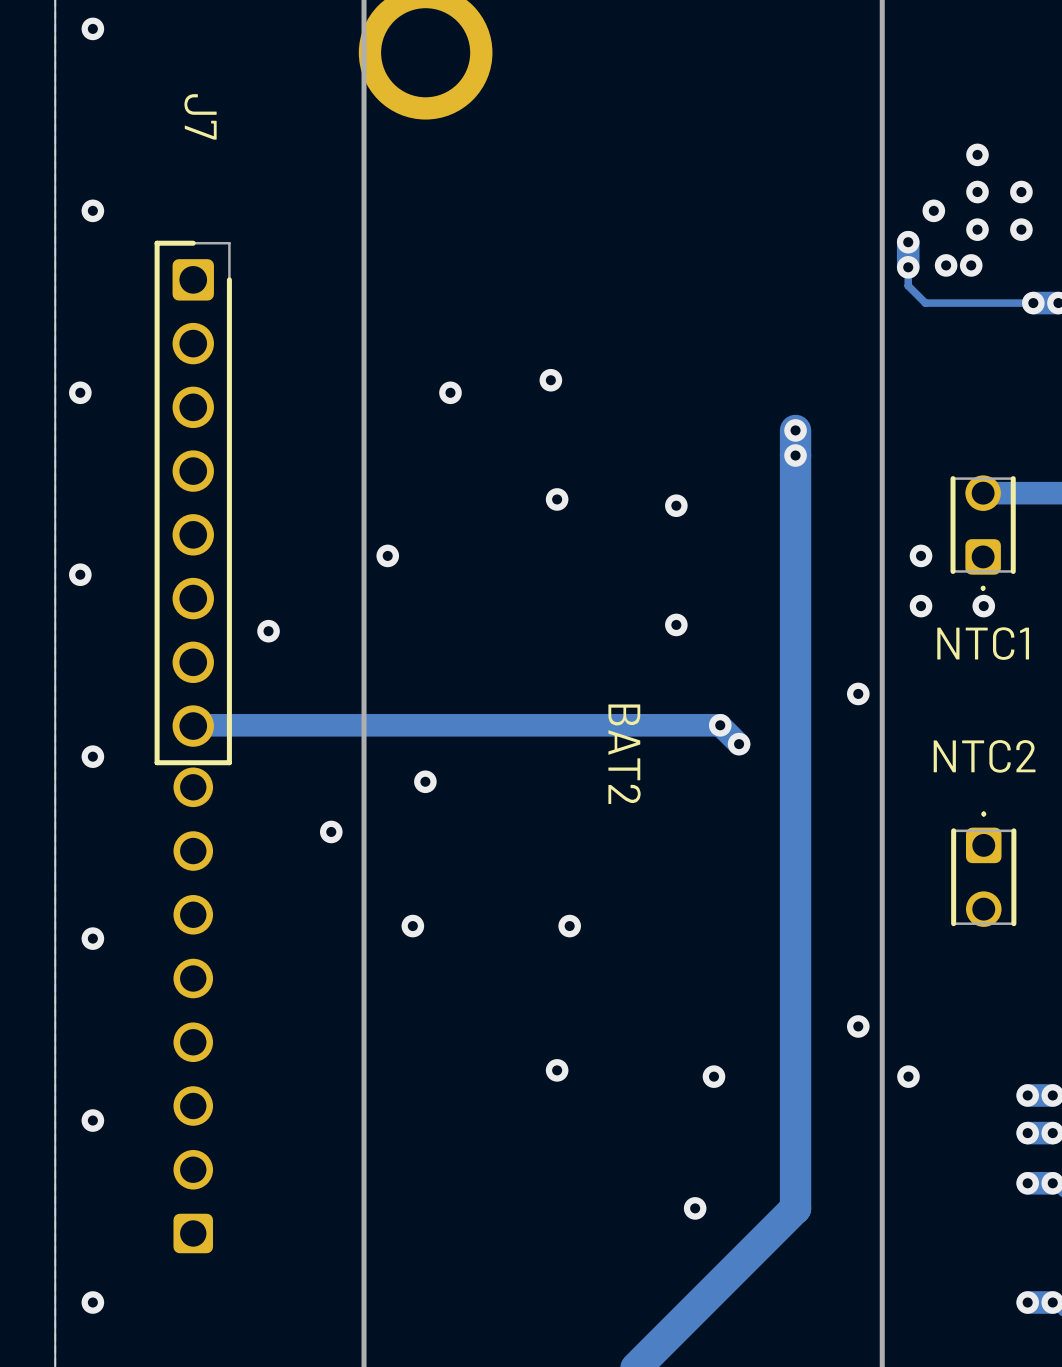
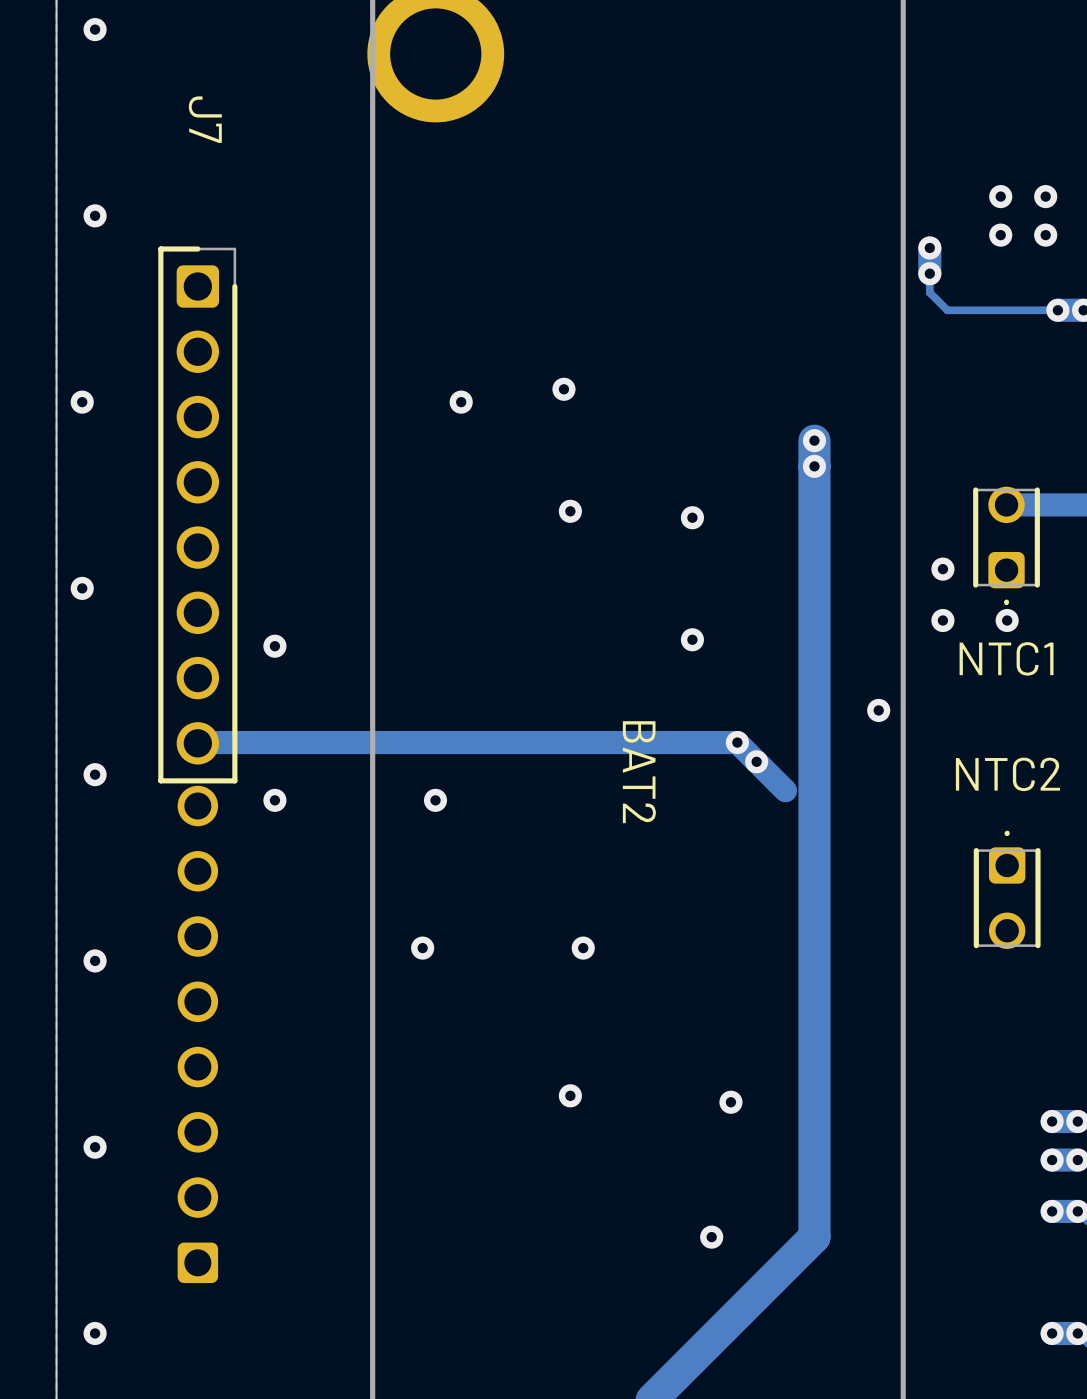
via: (977, 154) -> none
via: (933, 210) -> none
via: (946, 265) -> none
via: (971, 265) -> none
via: (387, 555) -> none
track: none -> (756, 761) (785, 790)
via position: (331, 831) -> (274, 800)
via: (858, 1026) -> none
via: (908, 1076) -> none

